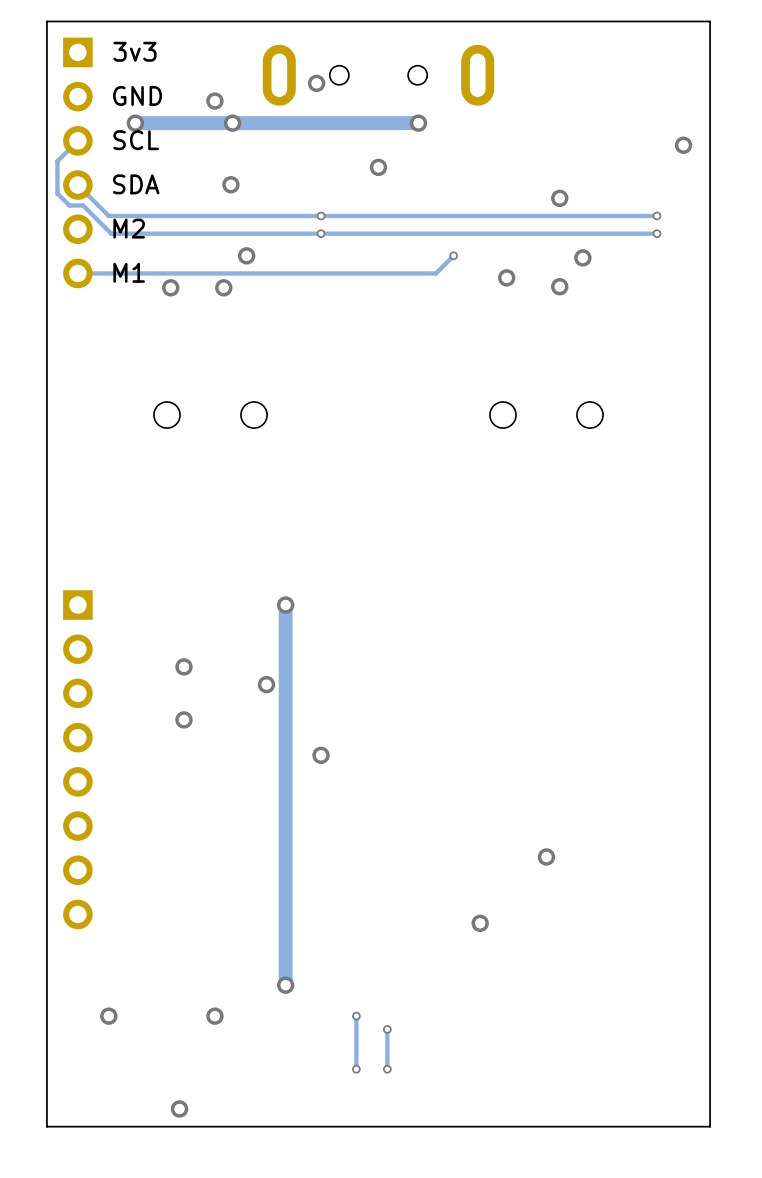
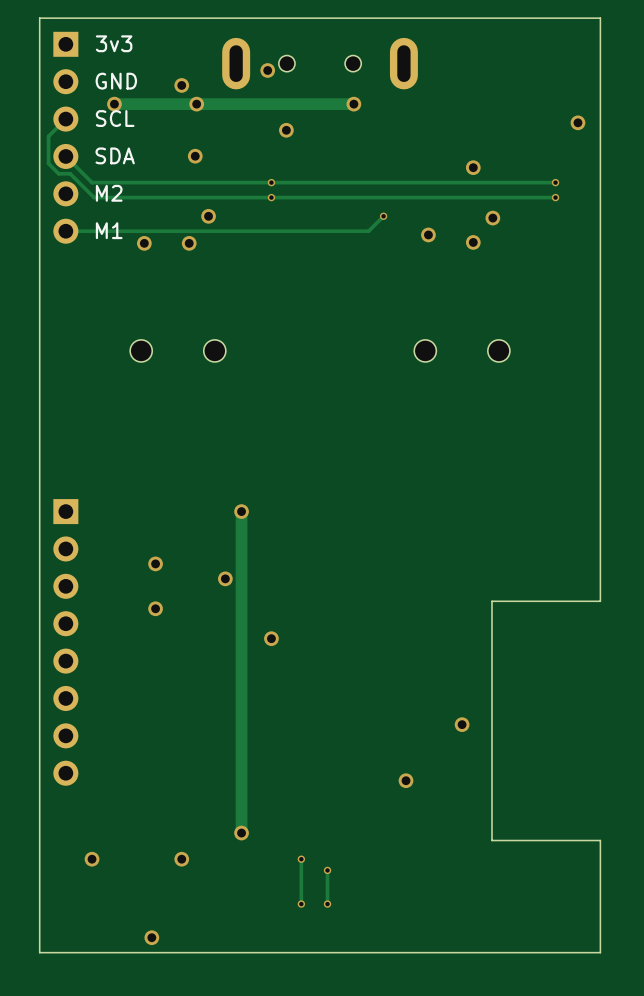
via position: (378, 167) -> (286, 130)
board edge: (710, 711) (710, 994) -> (600, 601) (491, 601) (491, 840) (600, 840)

